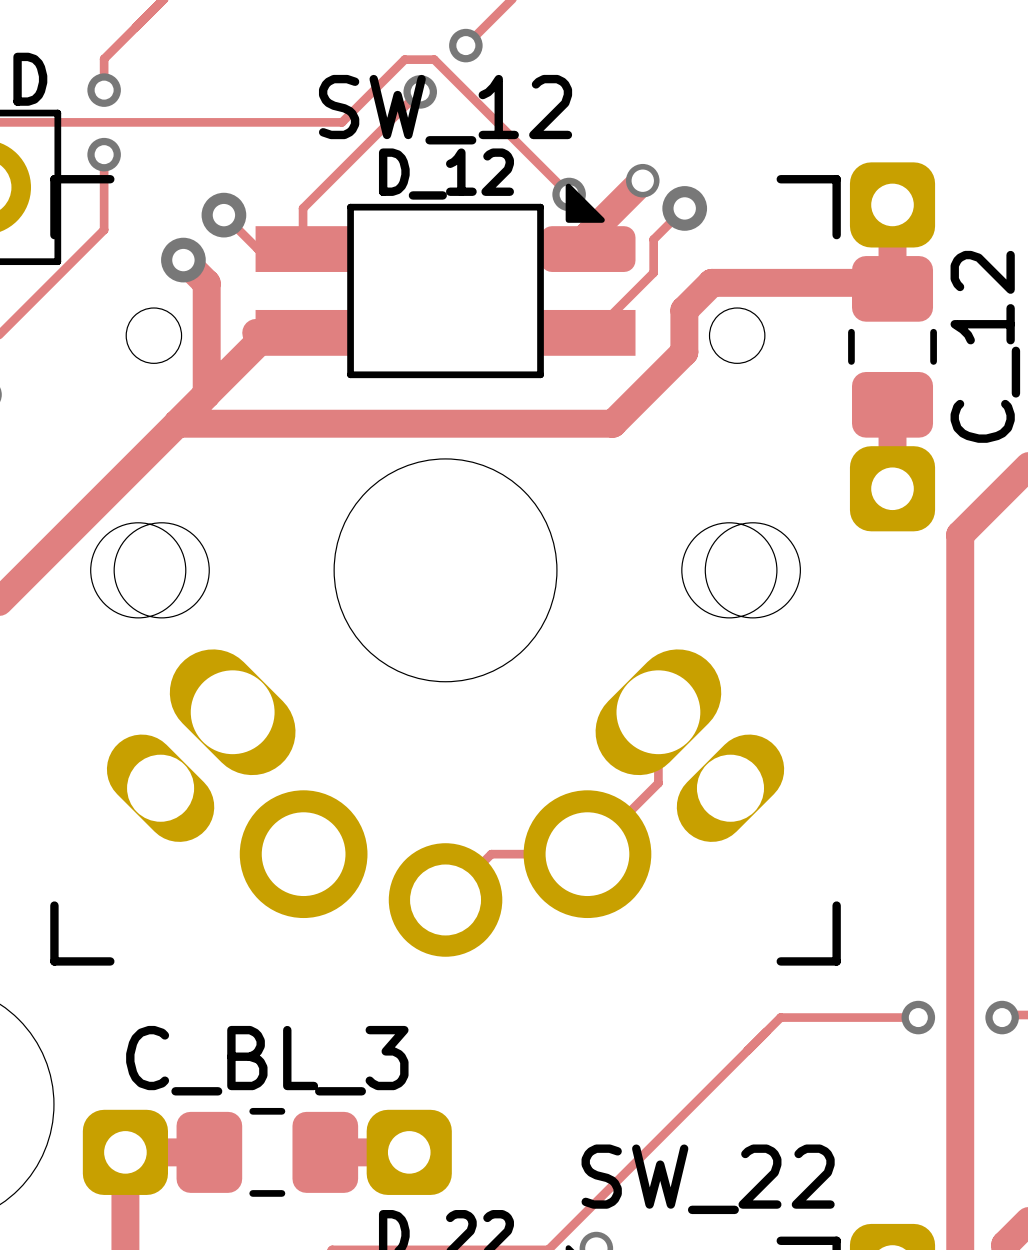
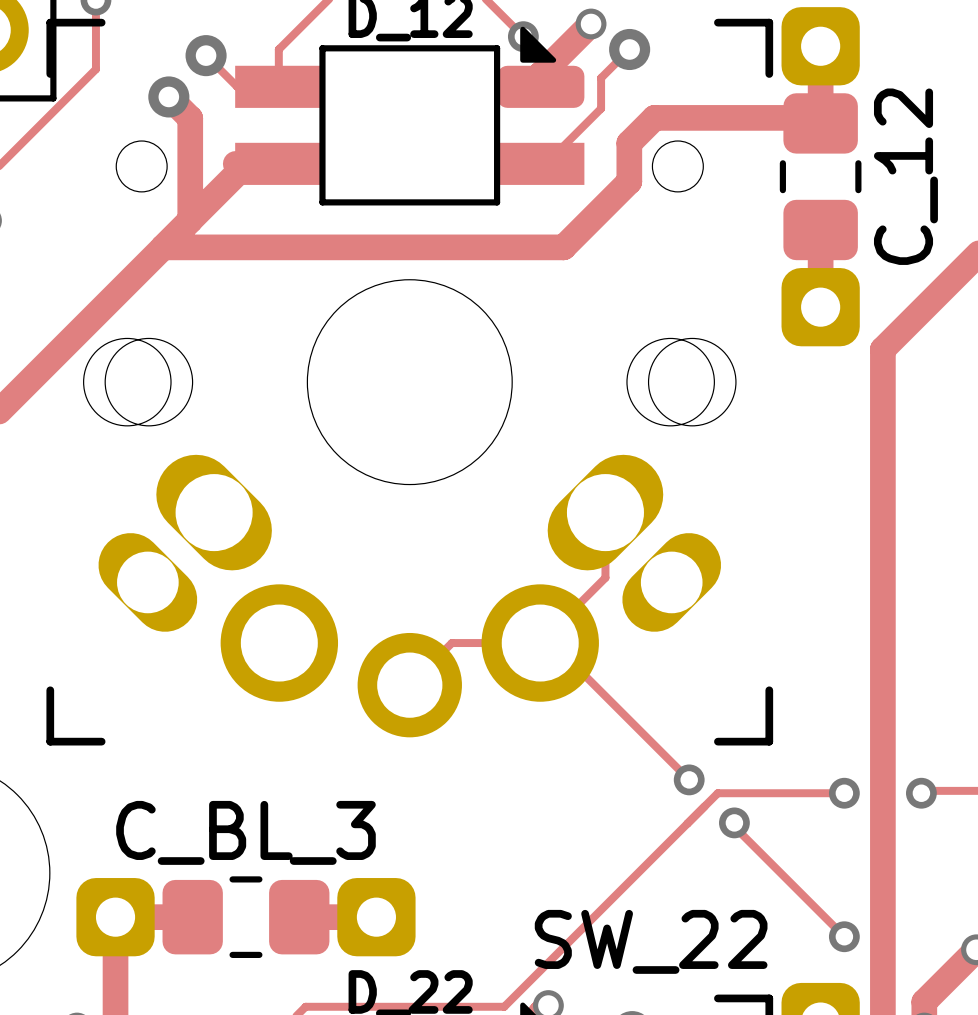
track: none -> (540, 643) (552, 643) (689, 779)
via: none -> (689, 779)
track: none -> (734, 822) (734, 826) (844, 936)
via: none -> (734, 822)
via: none -> (844, 936)

